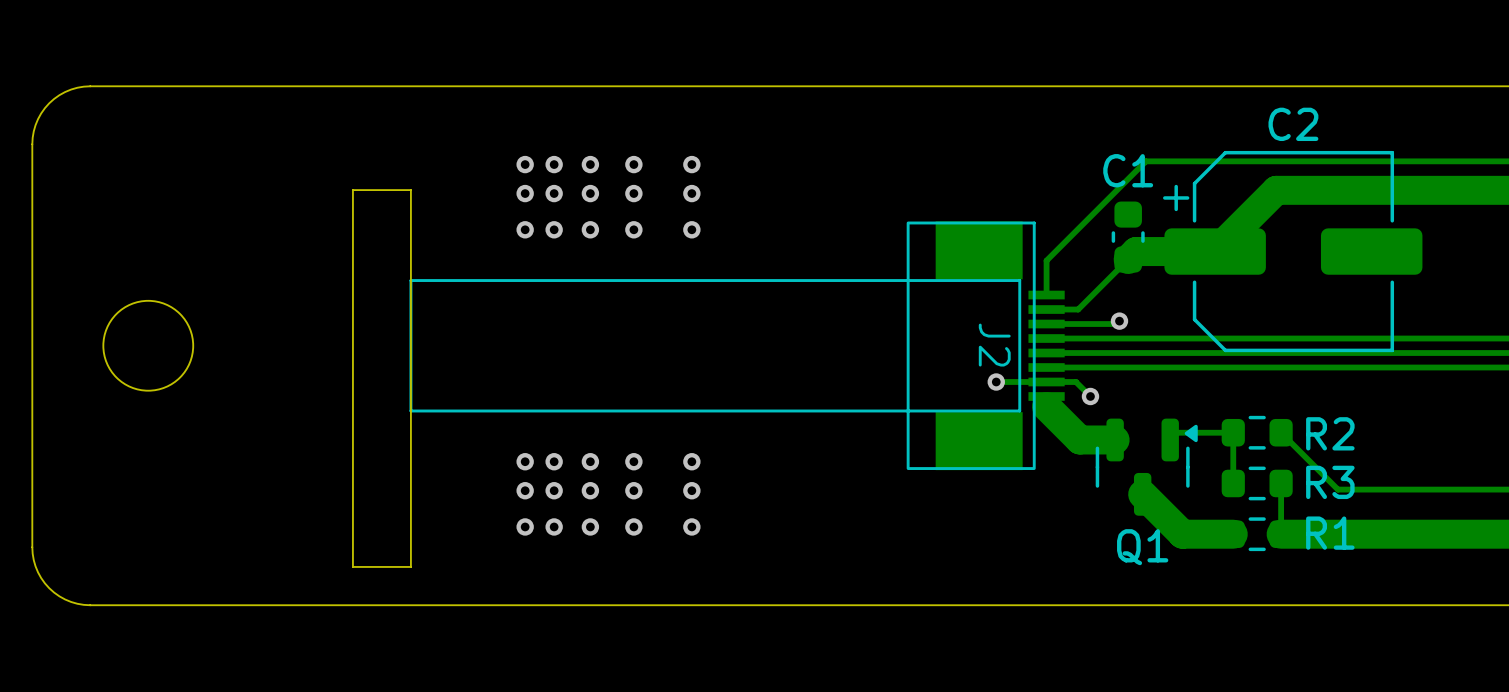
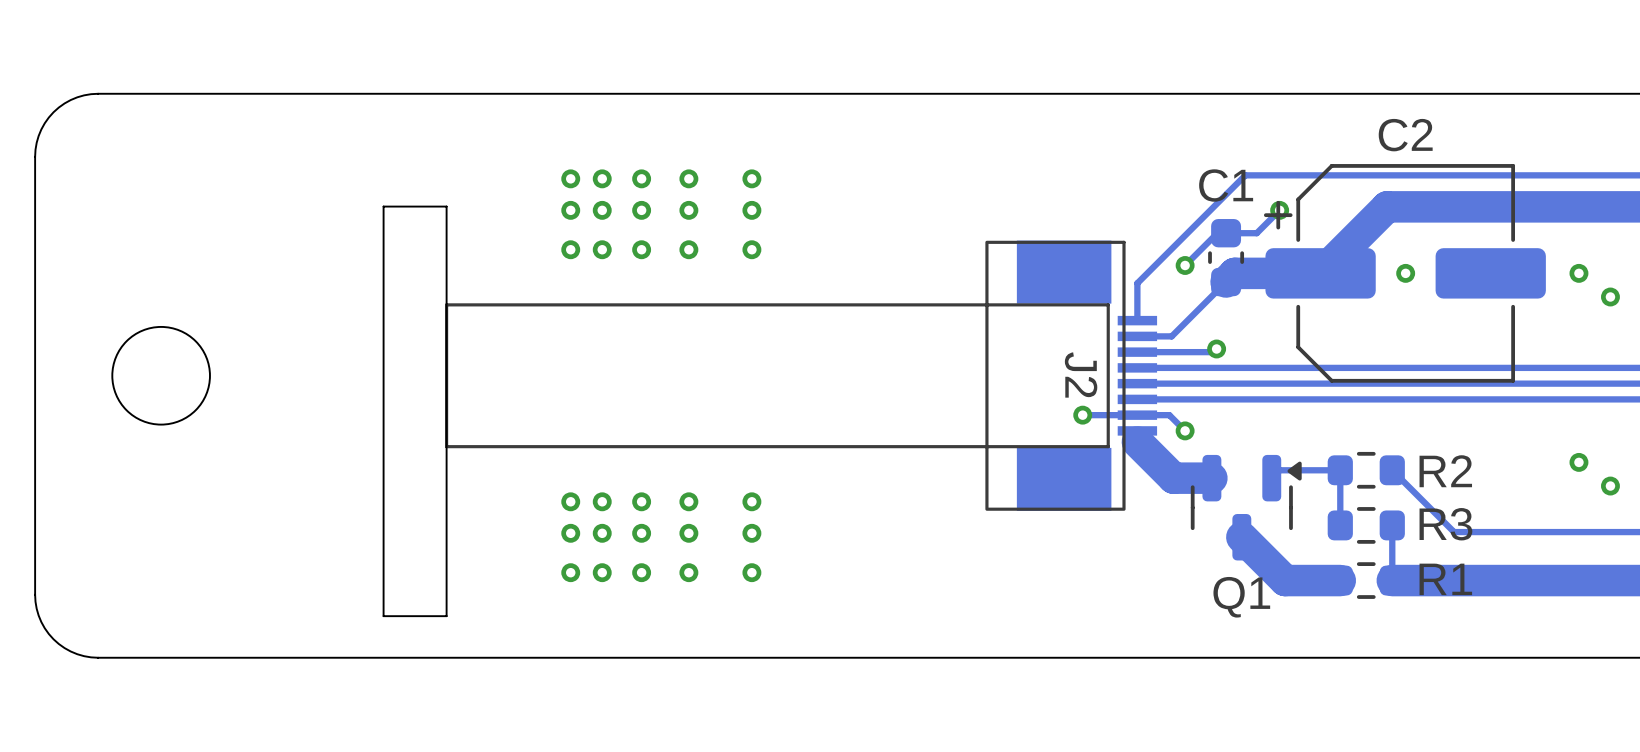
track: none -> (1279, 210) (1256, 233) (1217, 233) (1185, 265)
via: none -> (1279, 210)
via: none -> (1185, 265)
via: none -> (1405, 273)
via: none -> (1578, 273)
via: none -> (1610, 297)
via: none -> (1578, 462)
via: none -> (1610, 486)

